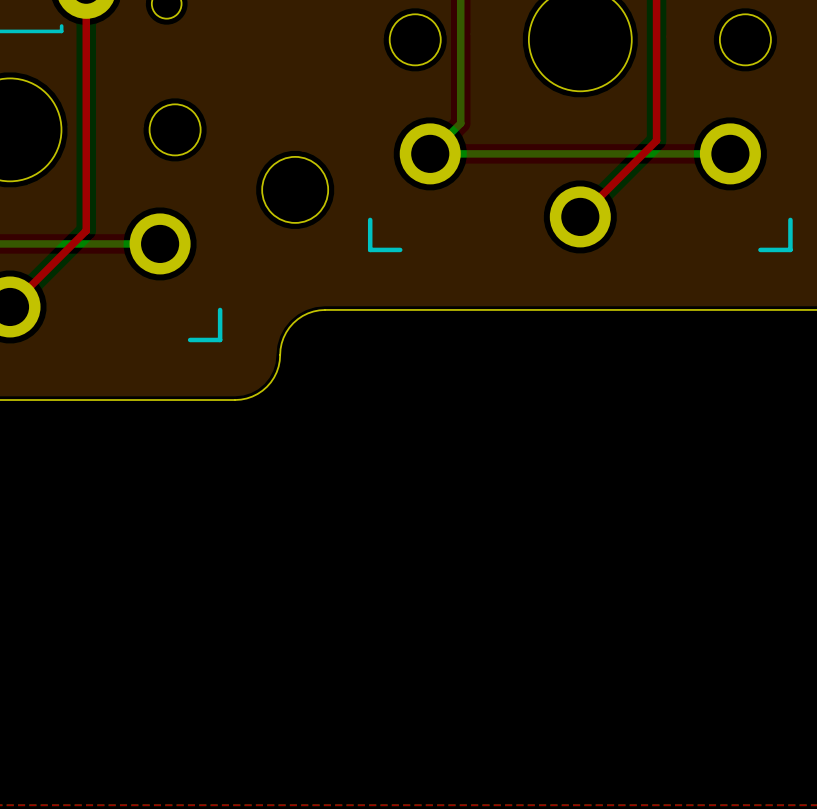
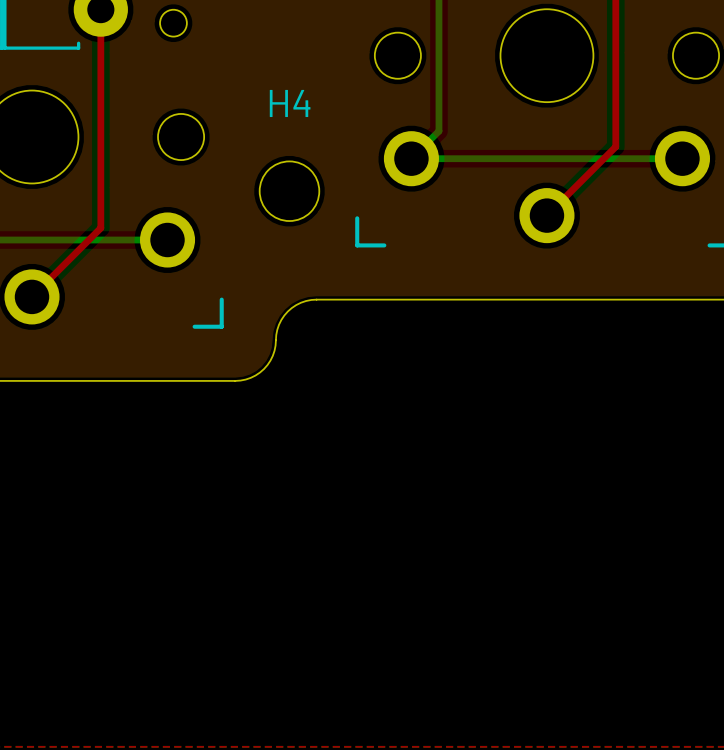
H4 name: none -> H4 (290, 103)

